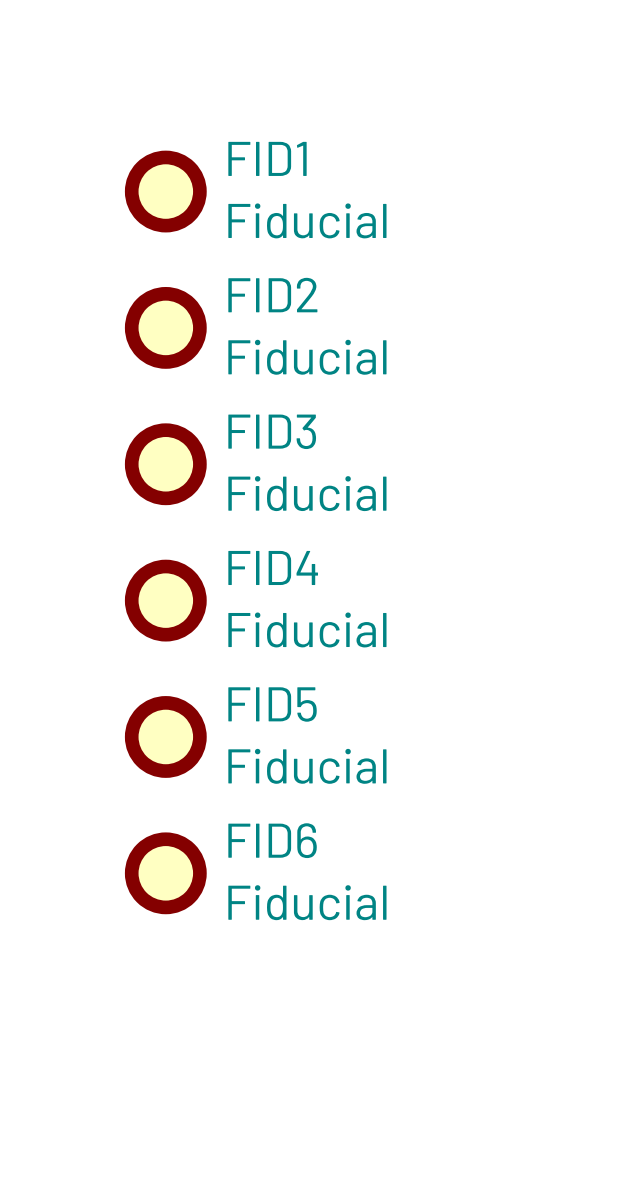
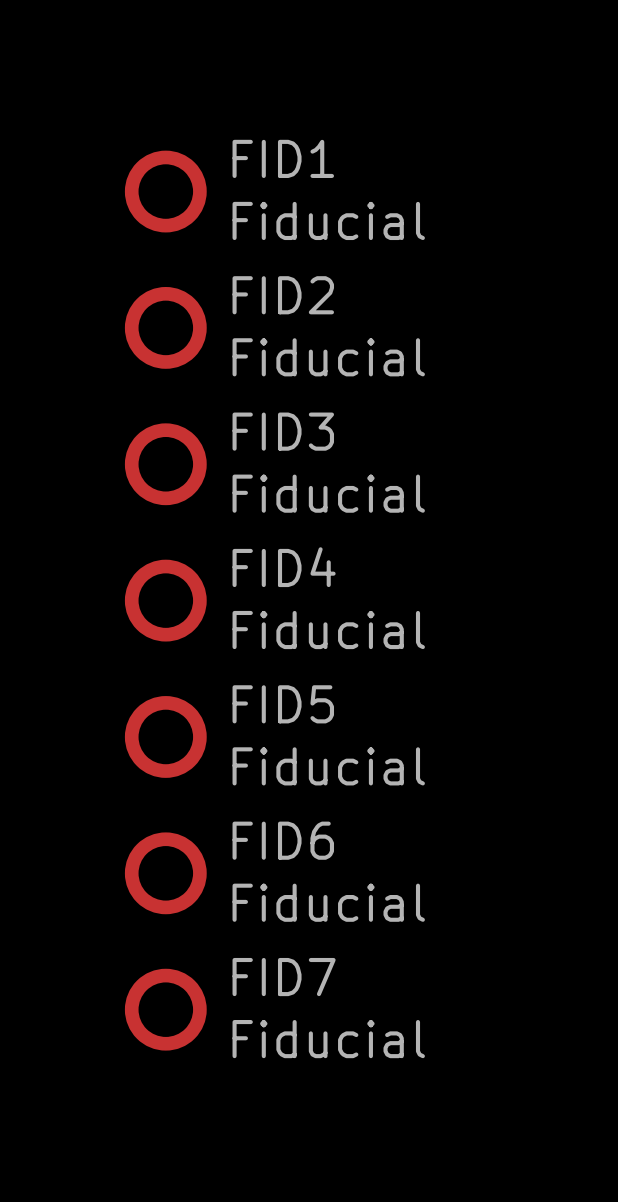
FID7: none -> Fiducial (165, 1009)

